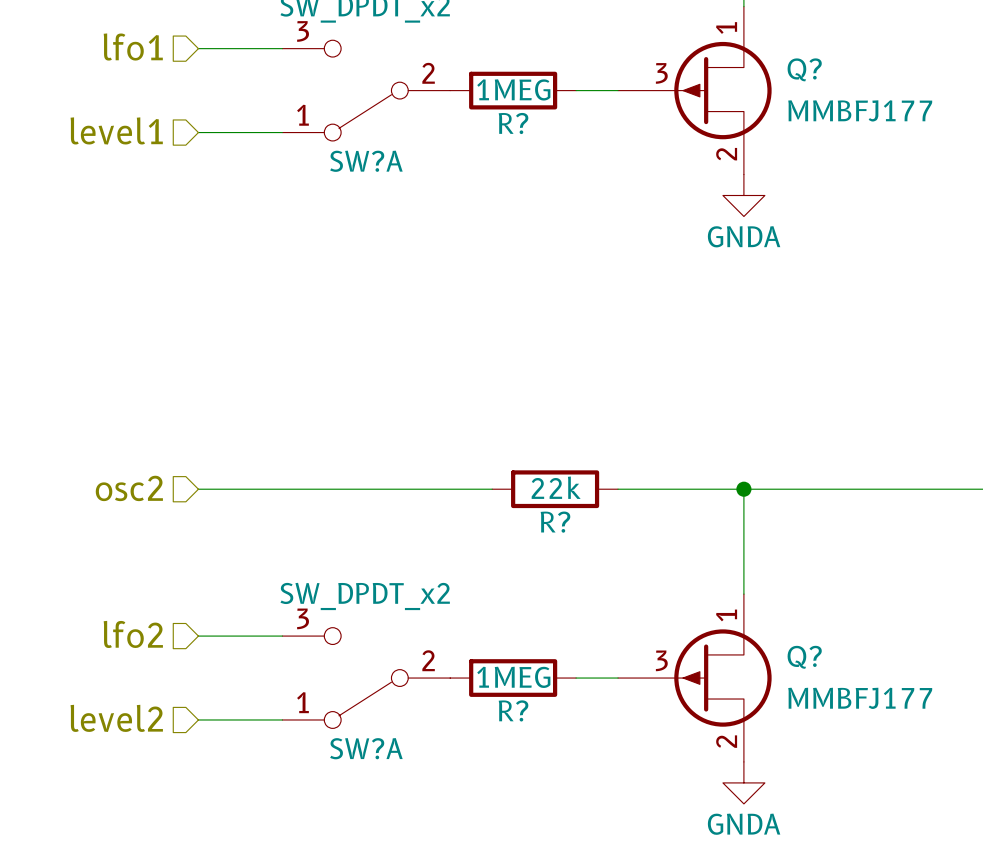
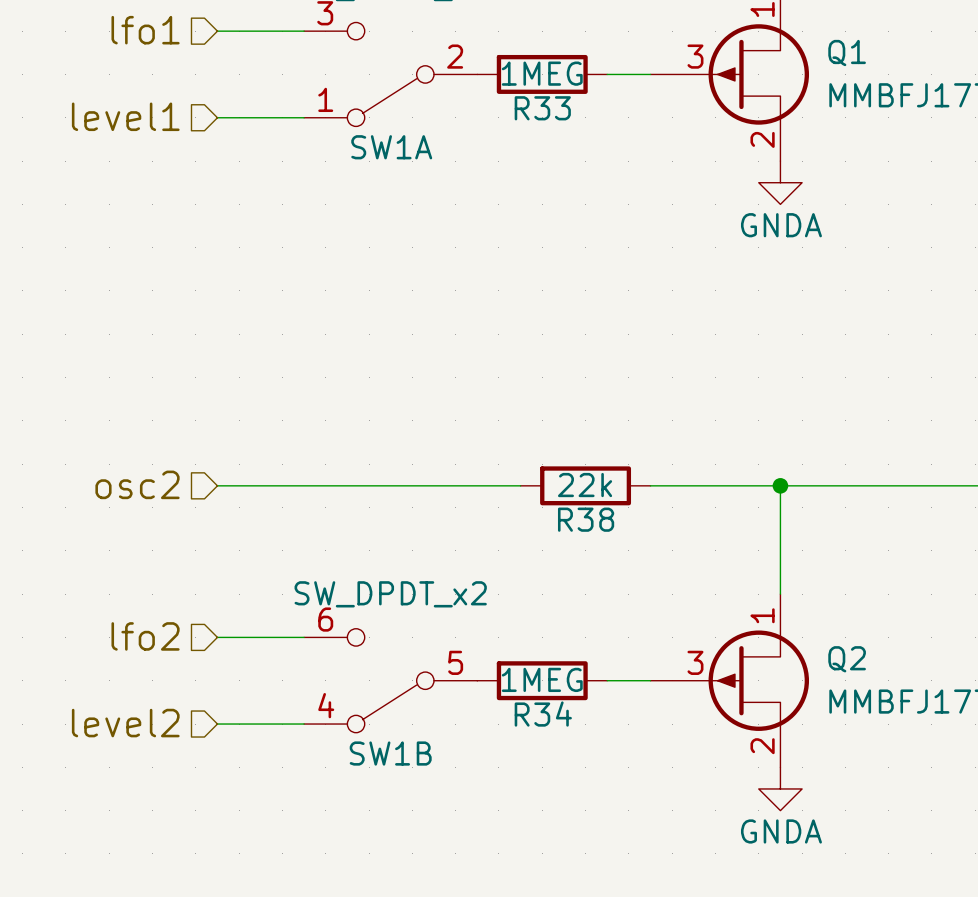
Q? name: Q? (804, 69) -> Q1 (847, 53)
R? name: R? (513, 123) -> R33 (542, 108)
SW?A name: SW?A (366, 161) -> SW1A (391, 147)
R? name: R? (555, 522) -> R38 (586, 519)
SW?A pin number: 3 (303, 618) -> 6 (325, 619)
Q? name: Q? (804, 657) -> Q2 (847, 659)
SW?A pin number: 2 (428, 660) -> 5 (455, 662)
SW?A pin number: 1 (302, 702) -> 4 (326, 705)
R? name: R? (513, 710) -> R34 (543, 714)
SW?A name: SW?A (366, 748) -> SW1B (390, 753)

